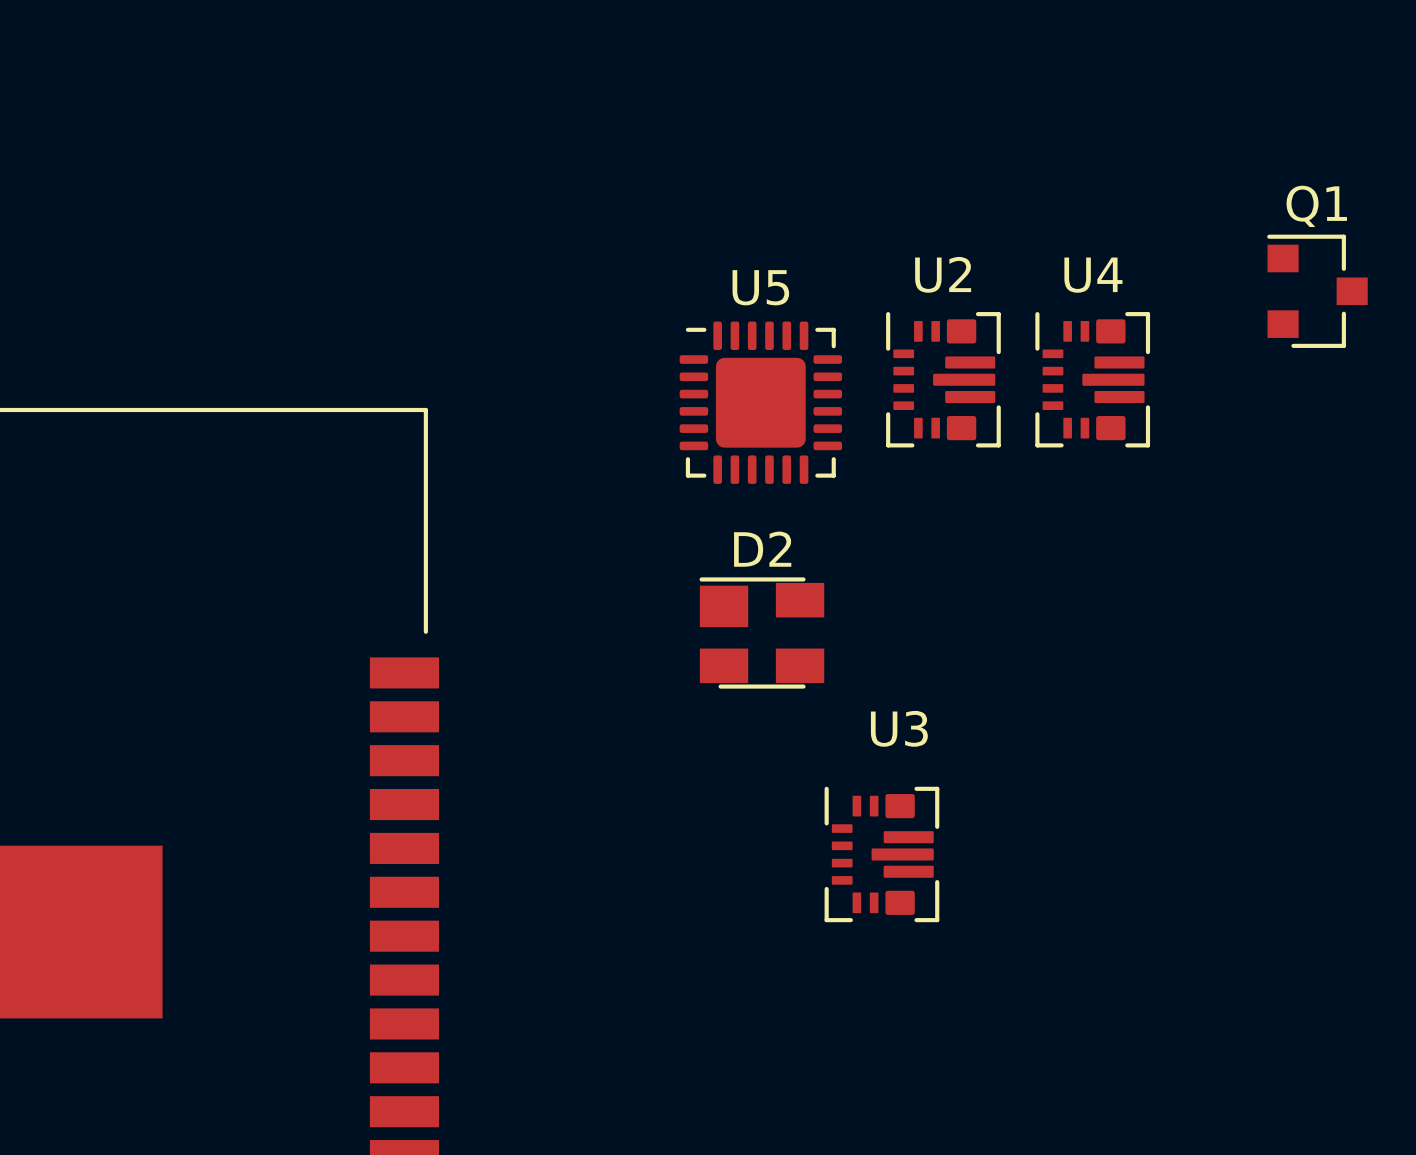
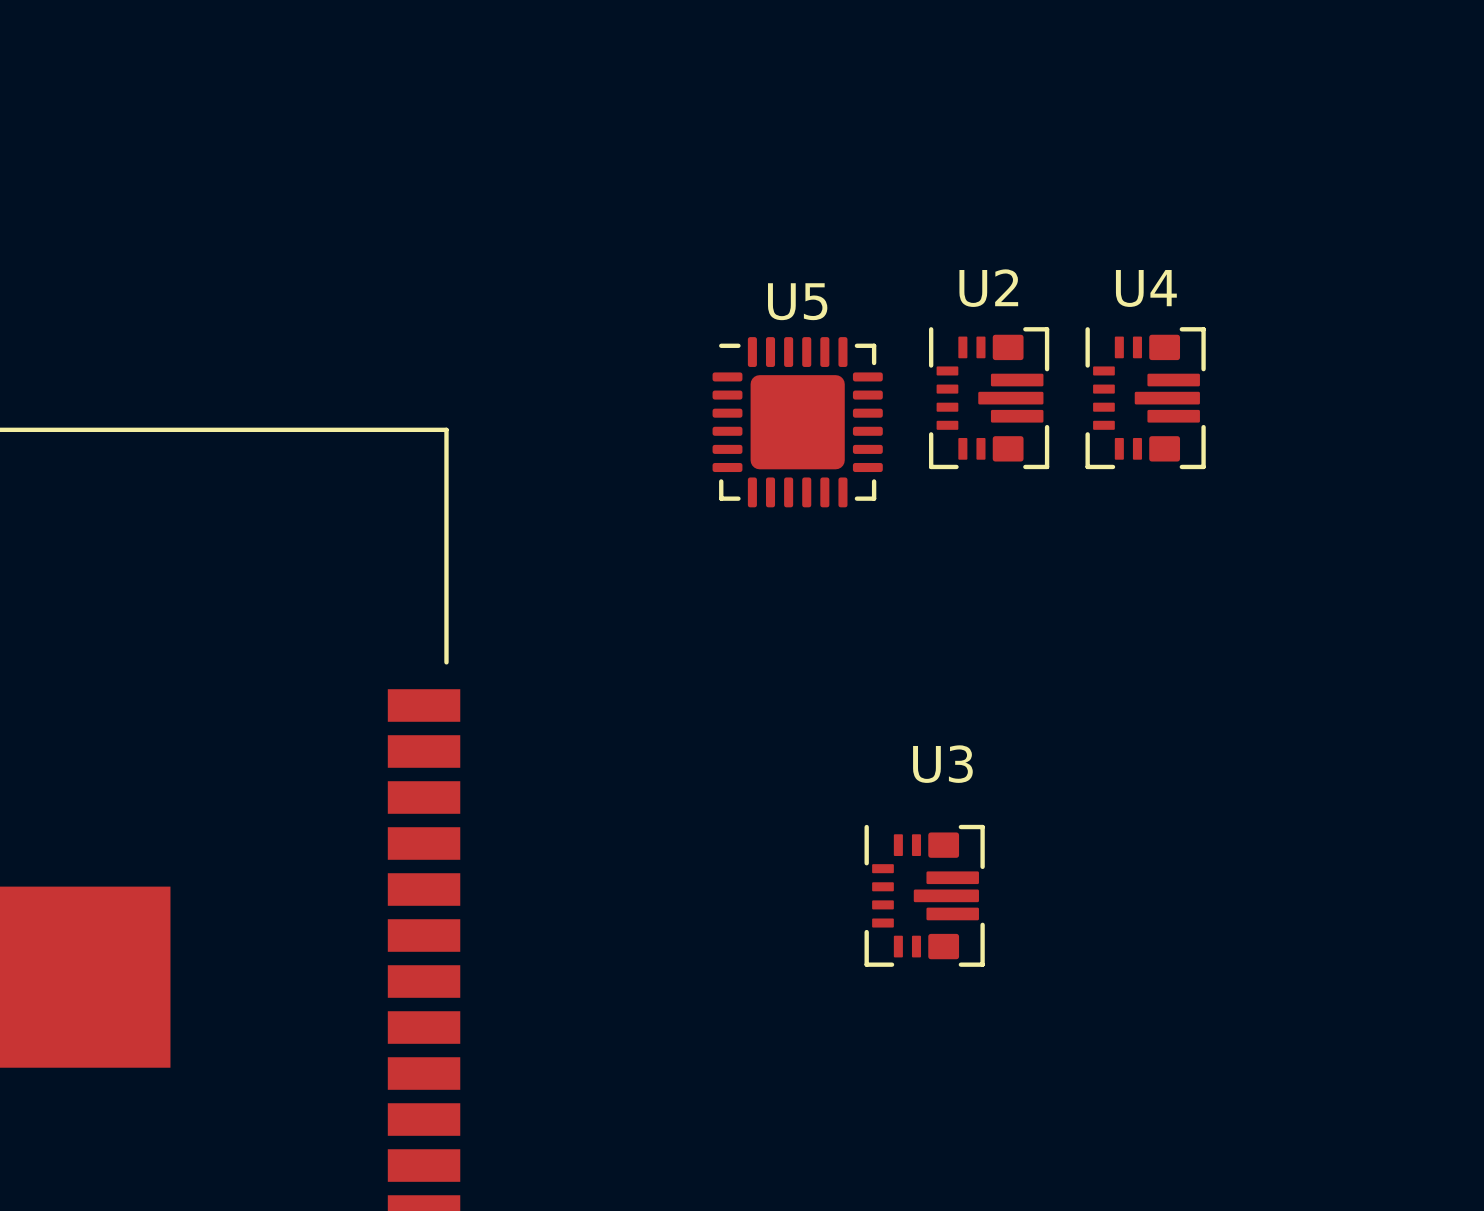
Q1: (1317, 291) -> none
D2: (761, 633) -> none

